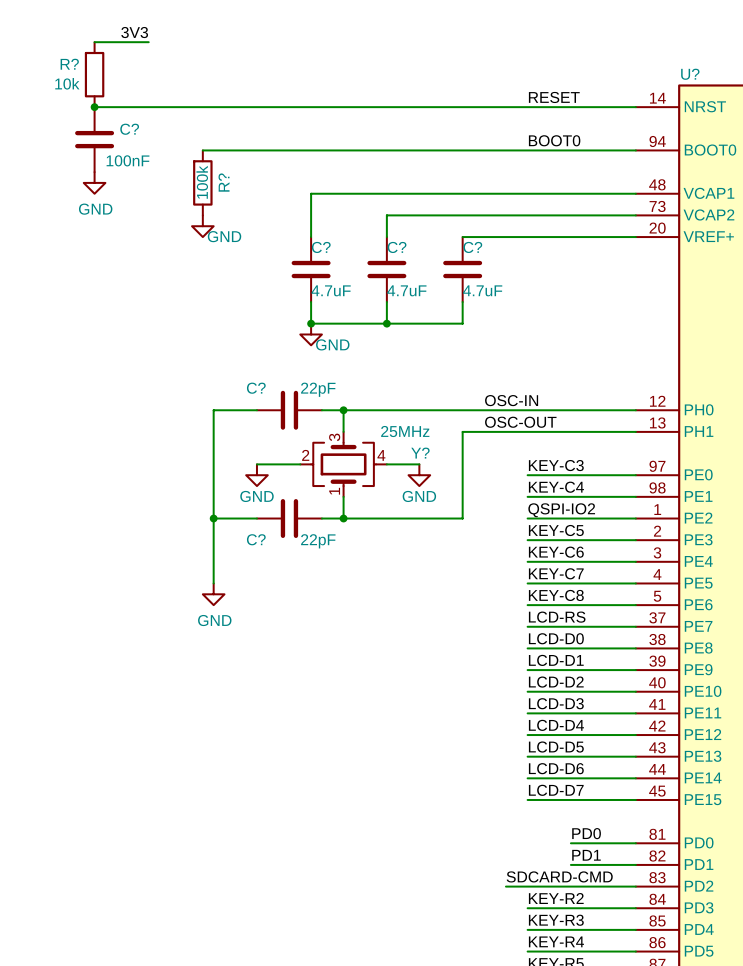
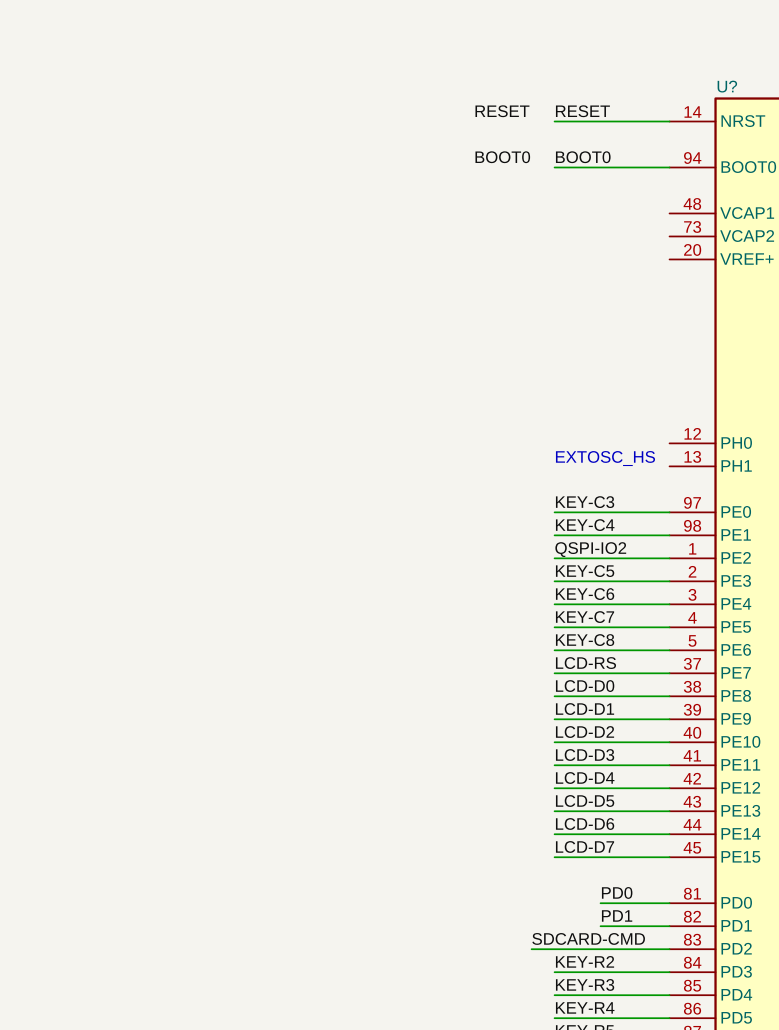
label: 3V3 (134, 32) -> none
wire: (94, 42) (148, 42) -> none
R?: 10k (94, 74) -> none
label: none -> RESET (502, 111)
wire: (94, 107) (527, 107) -> none
junction: (94, 107) -> none
C?: 100nF (94, 139) -> none
label: none -> BOOT0 (502, 157)
wire: (202, 150) (527, 150) -> none
power symbol: GND (94, 182) -> none
R?: 100k (202, 182) -> none
wire: (635, 193) (311, 193) (311, 237) -> none
wire: (635, 215) (386, 215) (386, 237) -> none
power symbol: GND (202, 226) -> none
wire: (462, 237) (635, 237) -> none
C?: 4.7uF (311, 269) -> none
C?: 4.7uF (386, 269) -> none
C?: 4.7uF (462, 269) -> none
wire: (311, 302) (311, 323) (462, 323) (462, 302) -> none
wire: (386, 302) (386, 323) -> none
junction: (311, 323) -> none
junction: (386, 323) -> none
power symbol: GND (311, 334) -> none
label: OSC-IN (511, 400) -> none
wire: (256, 410) (213, 410) (213, 583) -> none
C?: 22pF (289, 410) -> none
wire: (321, 410) (635, 410) -> none
wire: (343, 410) (343, 431) -> none
junction: (343, 410) -> none
label: OSC-OUT (520, 422) -> none
text: none -> EXTOSC_HS (605, 458)
wire: (635, 431) (462, 431) (462, 518) (321, 518) -> none
wire: (256, 464) (300, 464) -> none
Y?: 25MHz (343, 464) -> none
wire: (386, 464) (419, 464) -> none
power symbol: GND (256, 475) -> none
power symbol: GND (419, 475) -> none
wire: (343, 496) (343, 518) -> none
wire: (213, 518) (256, 518) -> none
junction: (213, 518) -> none
C?: 22pF (289, 518) -> none
junction: (343, 518) -> none
power symbol: GND (213, 594) -> none

